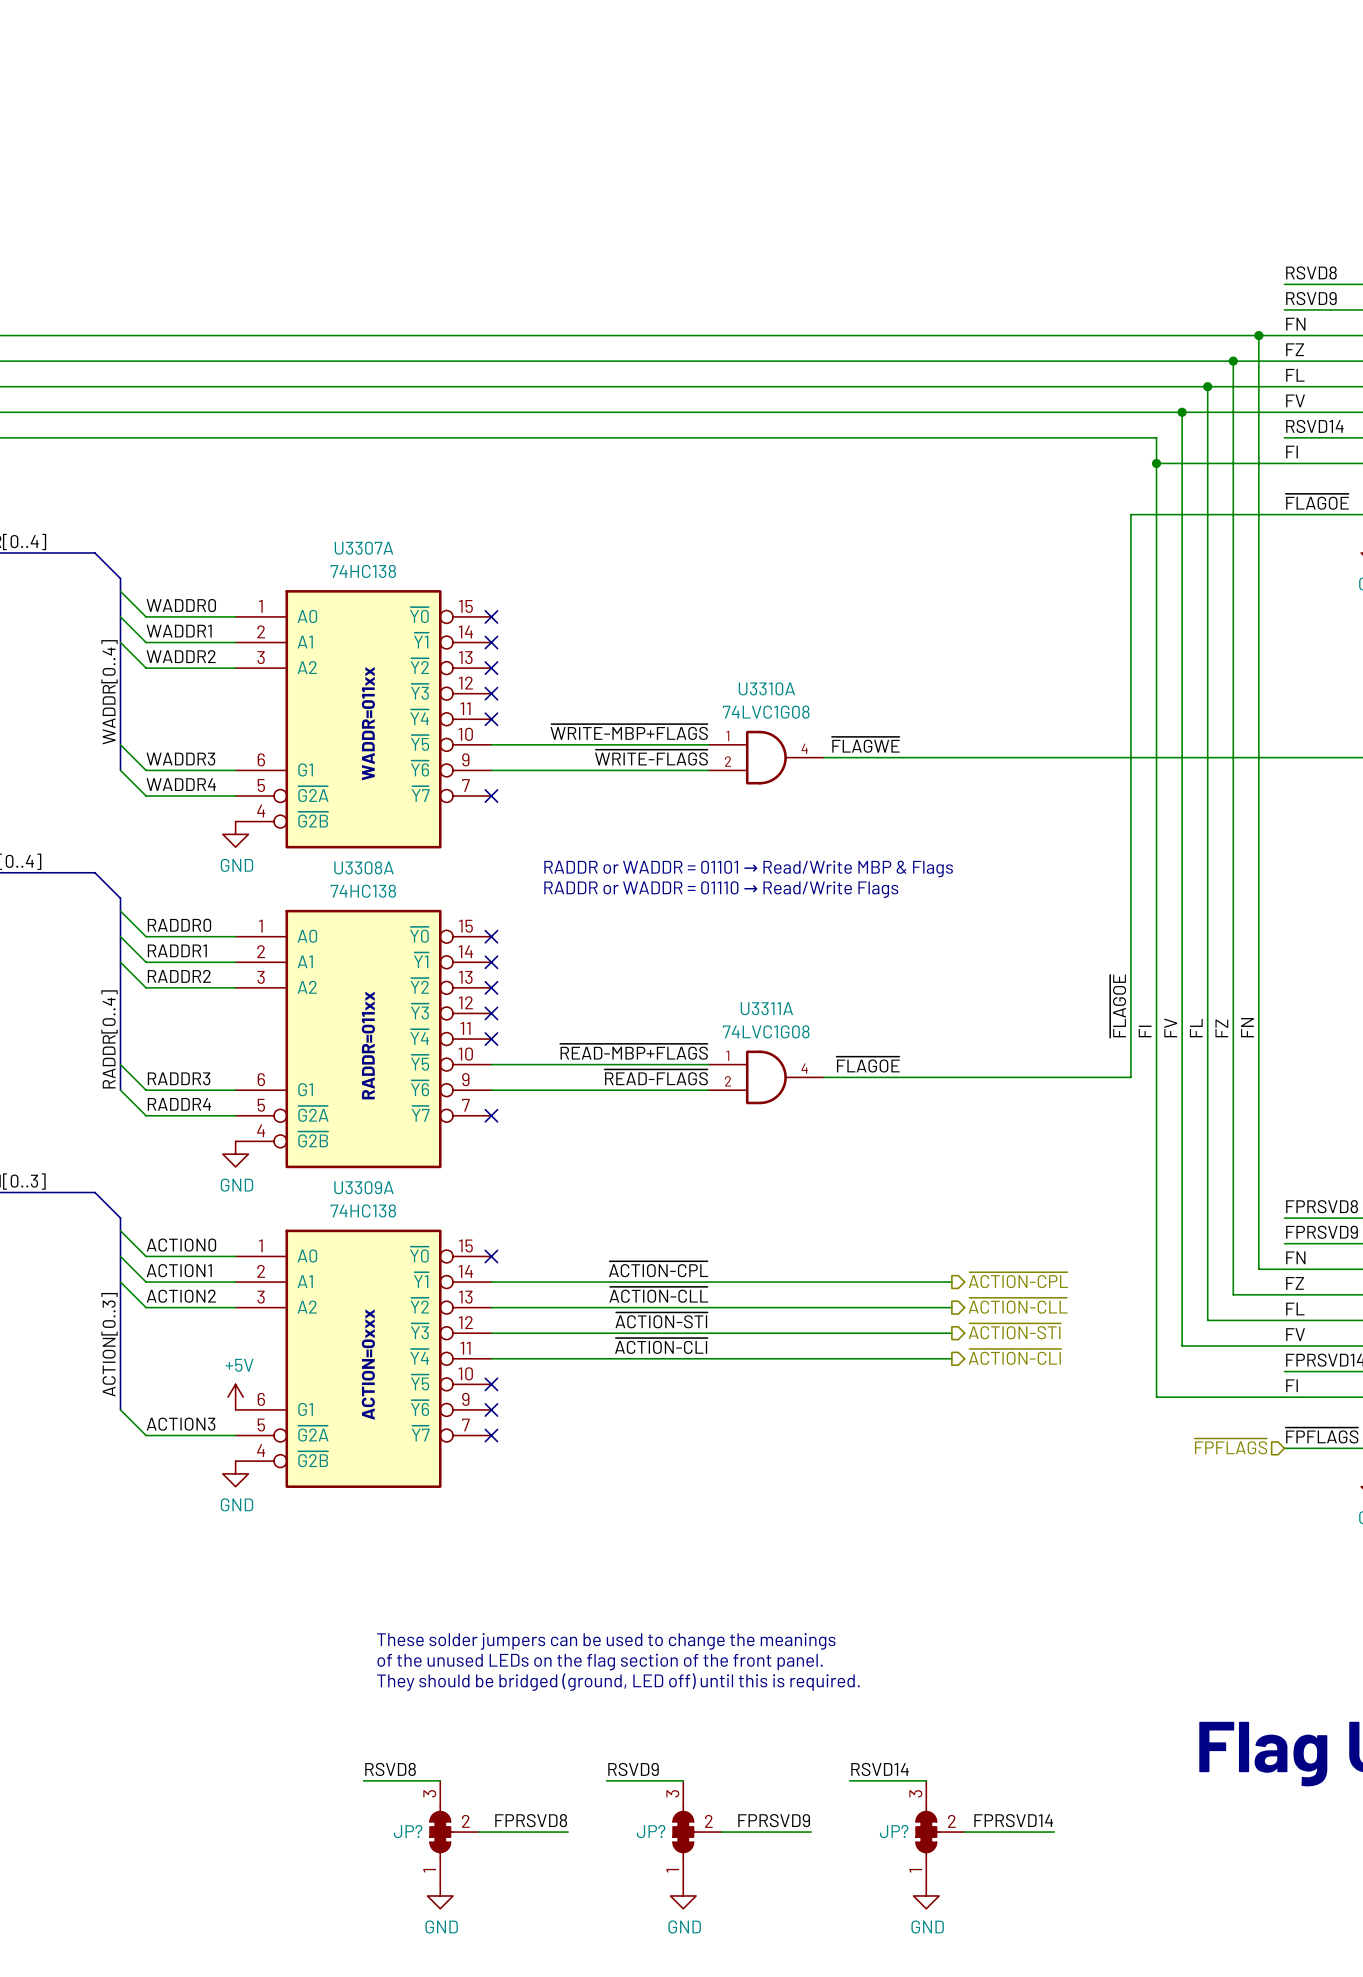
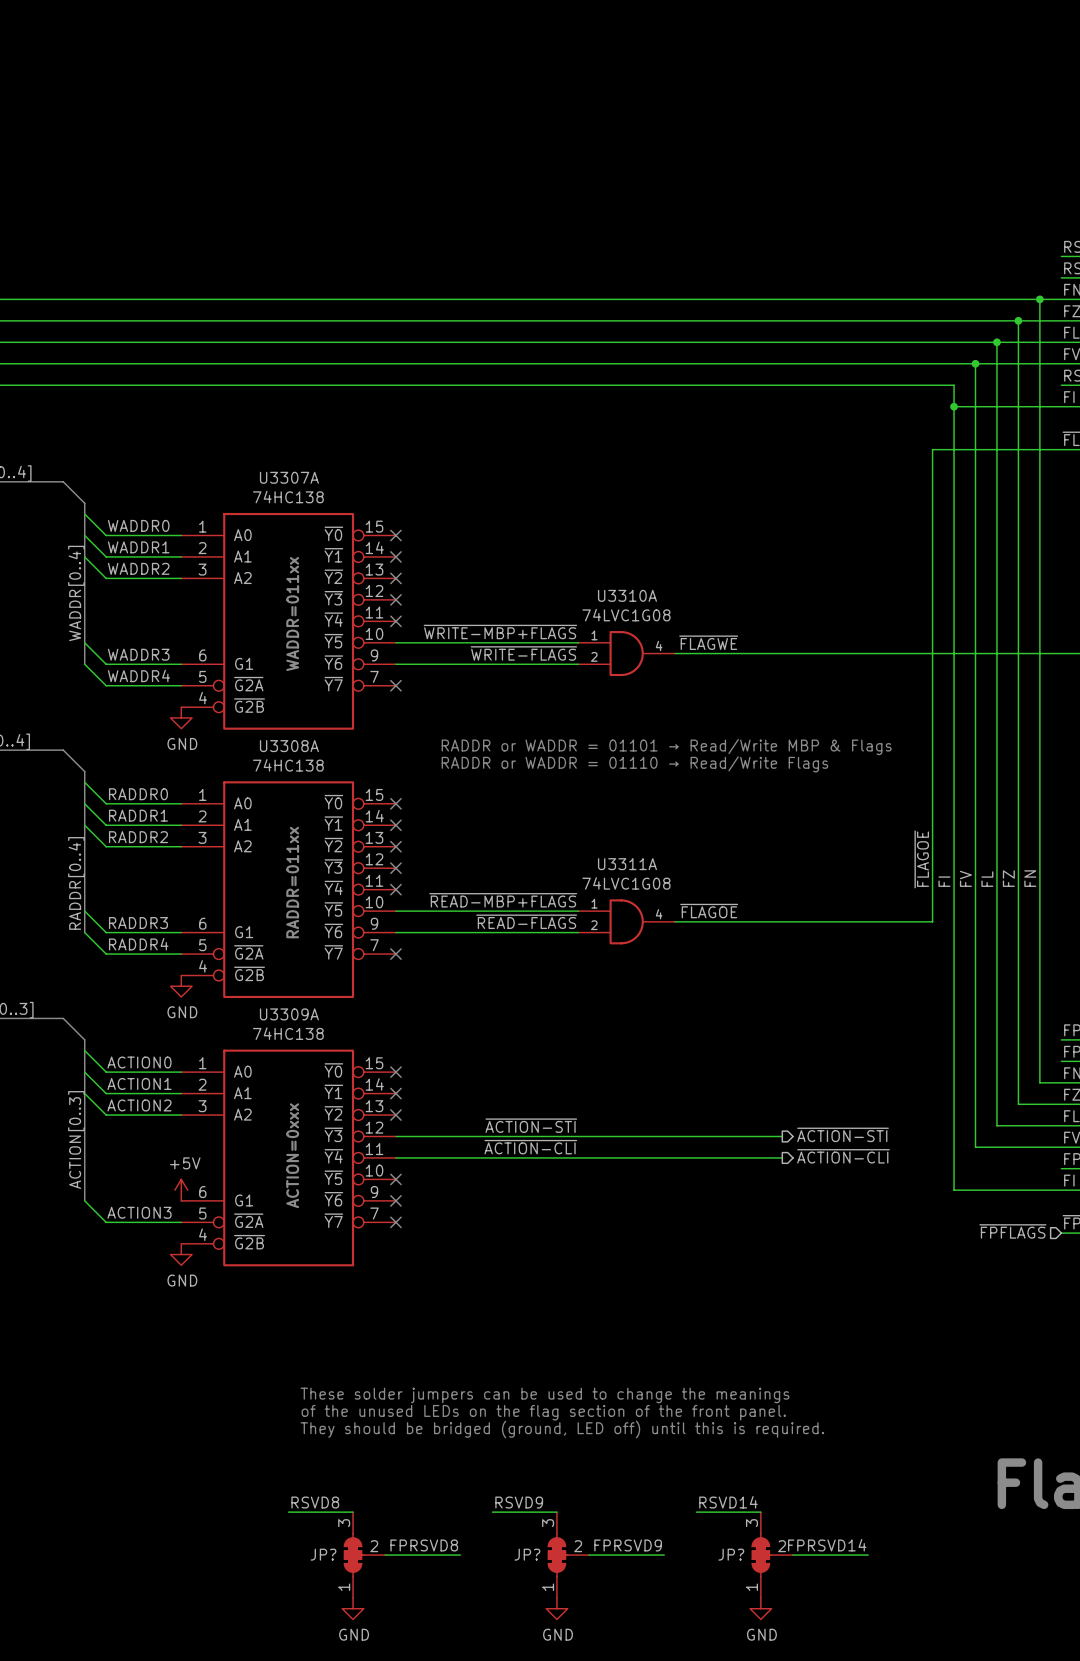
label: ~{ACTION-CPL} (658, 1269) -> none
hierarchical label: ~{ACTION-CPL} (1018, 1280) -> none
wire: (491, 1282) (951, 1282) -> none
no-connect mark: none -> (395, 1093)
label: ~{ACTION-CLL} (658, 1294) -> none
hierarchical label: ~{ACTION-CLL} (1018, 1305) -> none
wire: (491, 1307) (951, 1307) -> none
no-connect mark: none -> (395, 1115)

